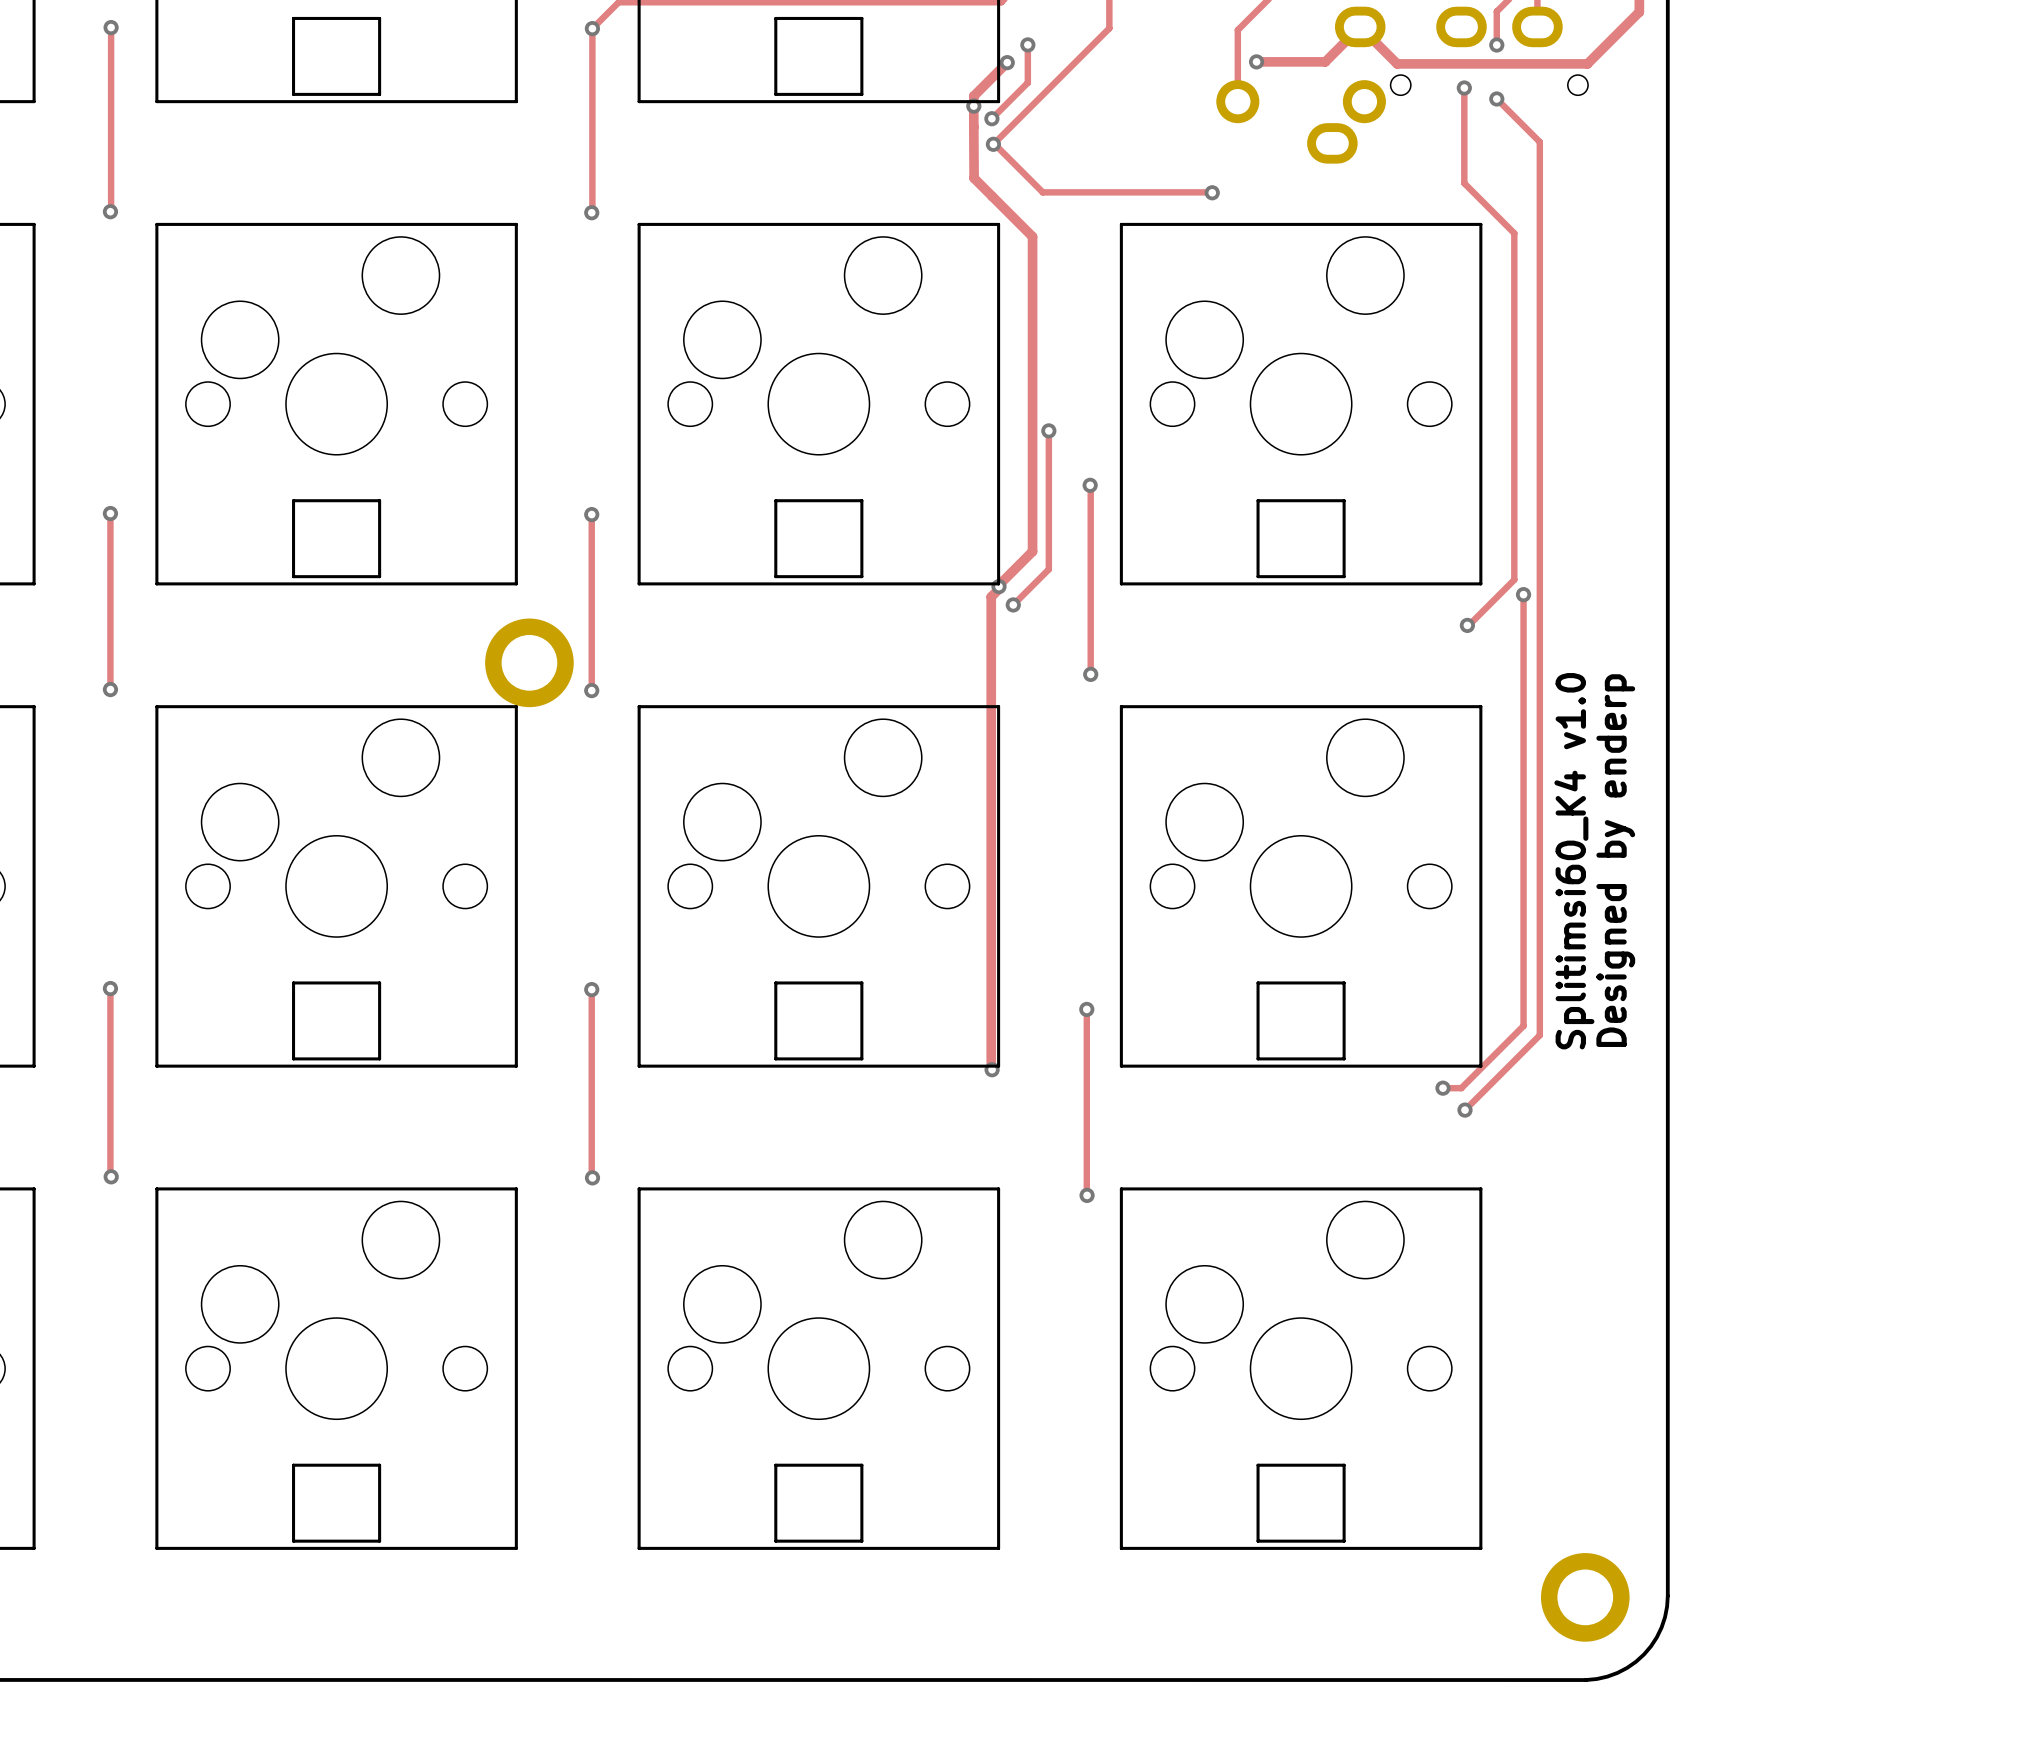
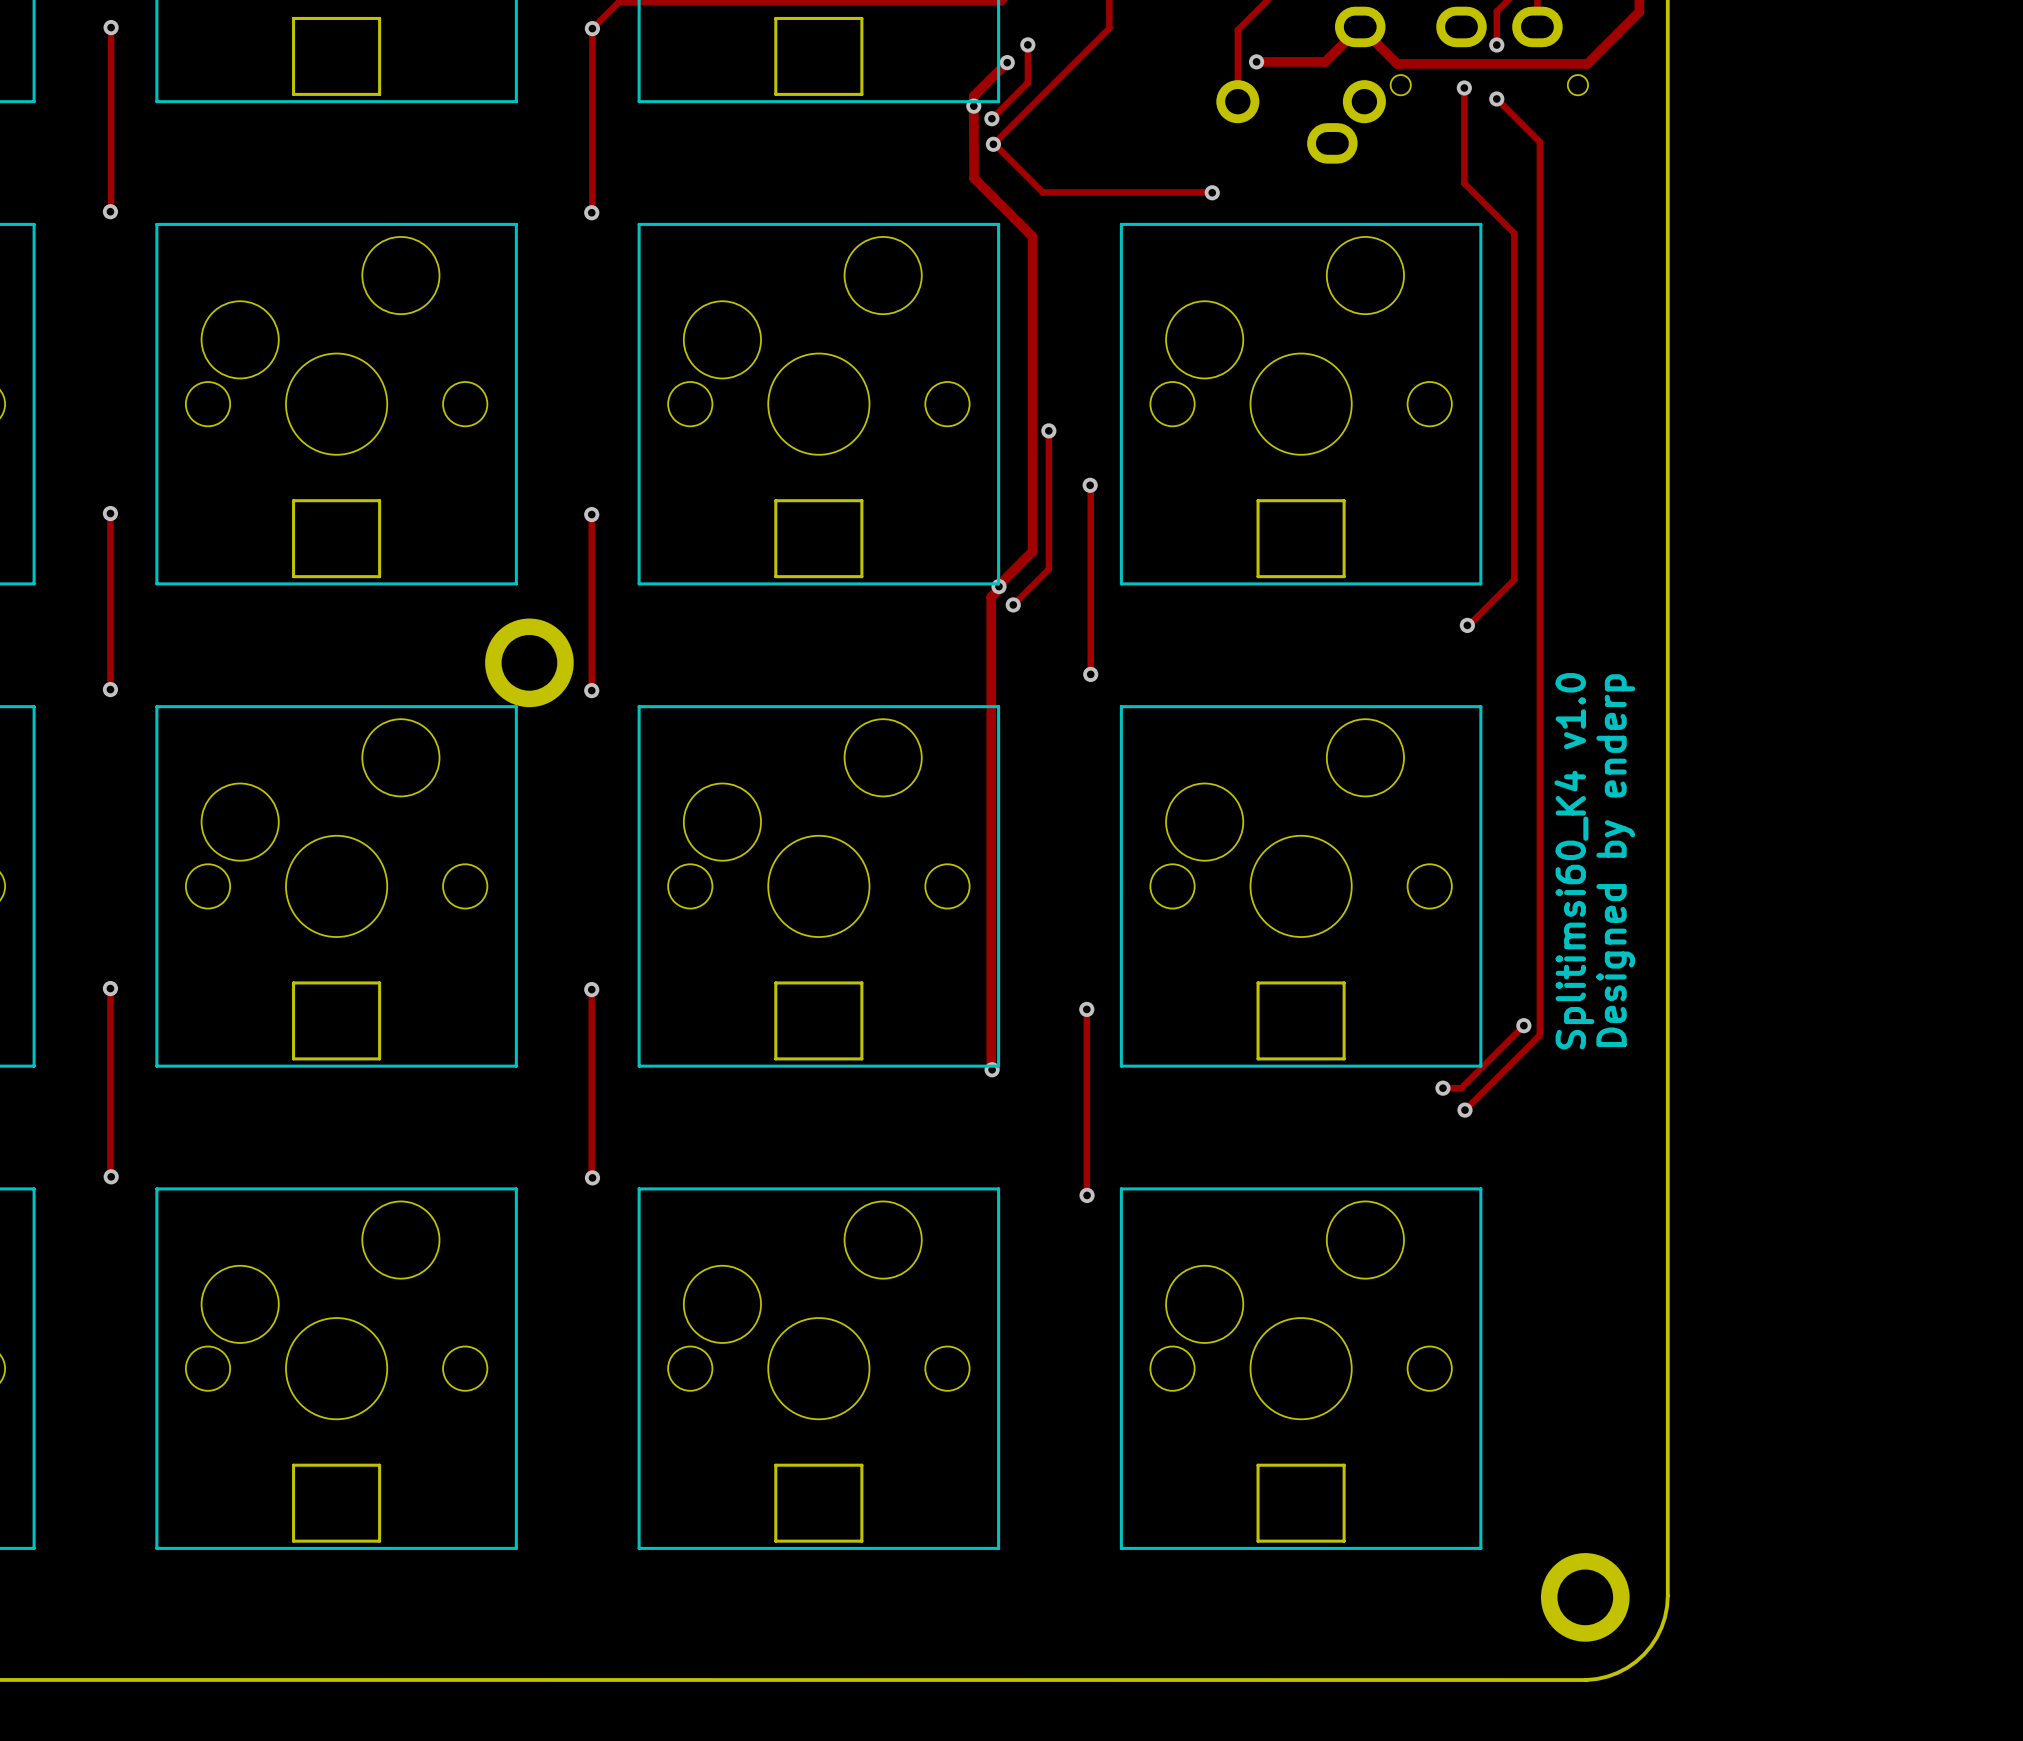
track: (1523, 594) (1523, 1025) -> none
via: (1523, 594) -> none
via: none -> (1523, 1025)

